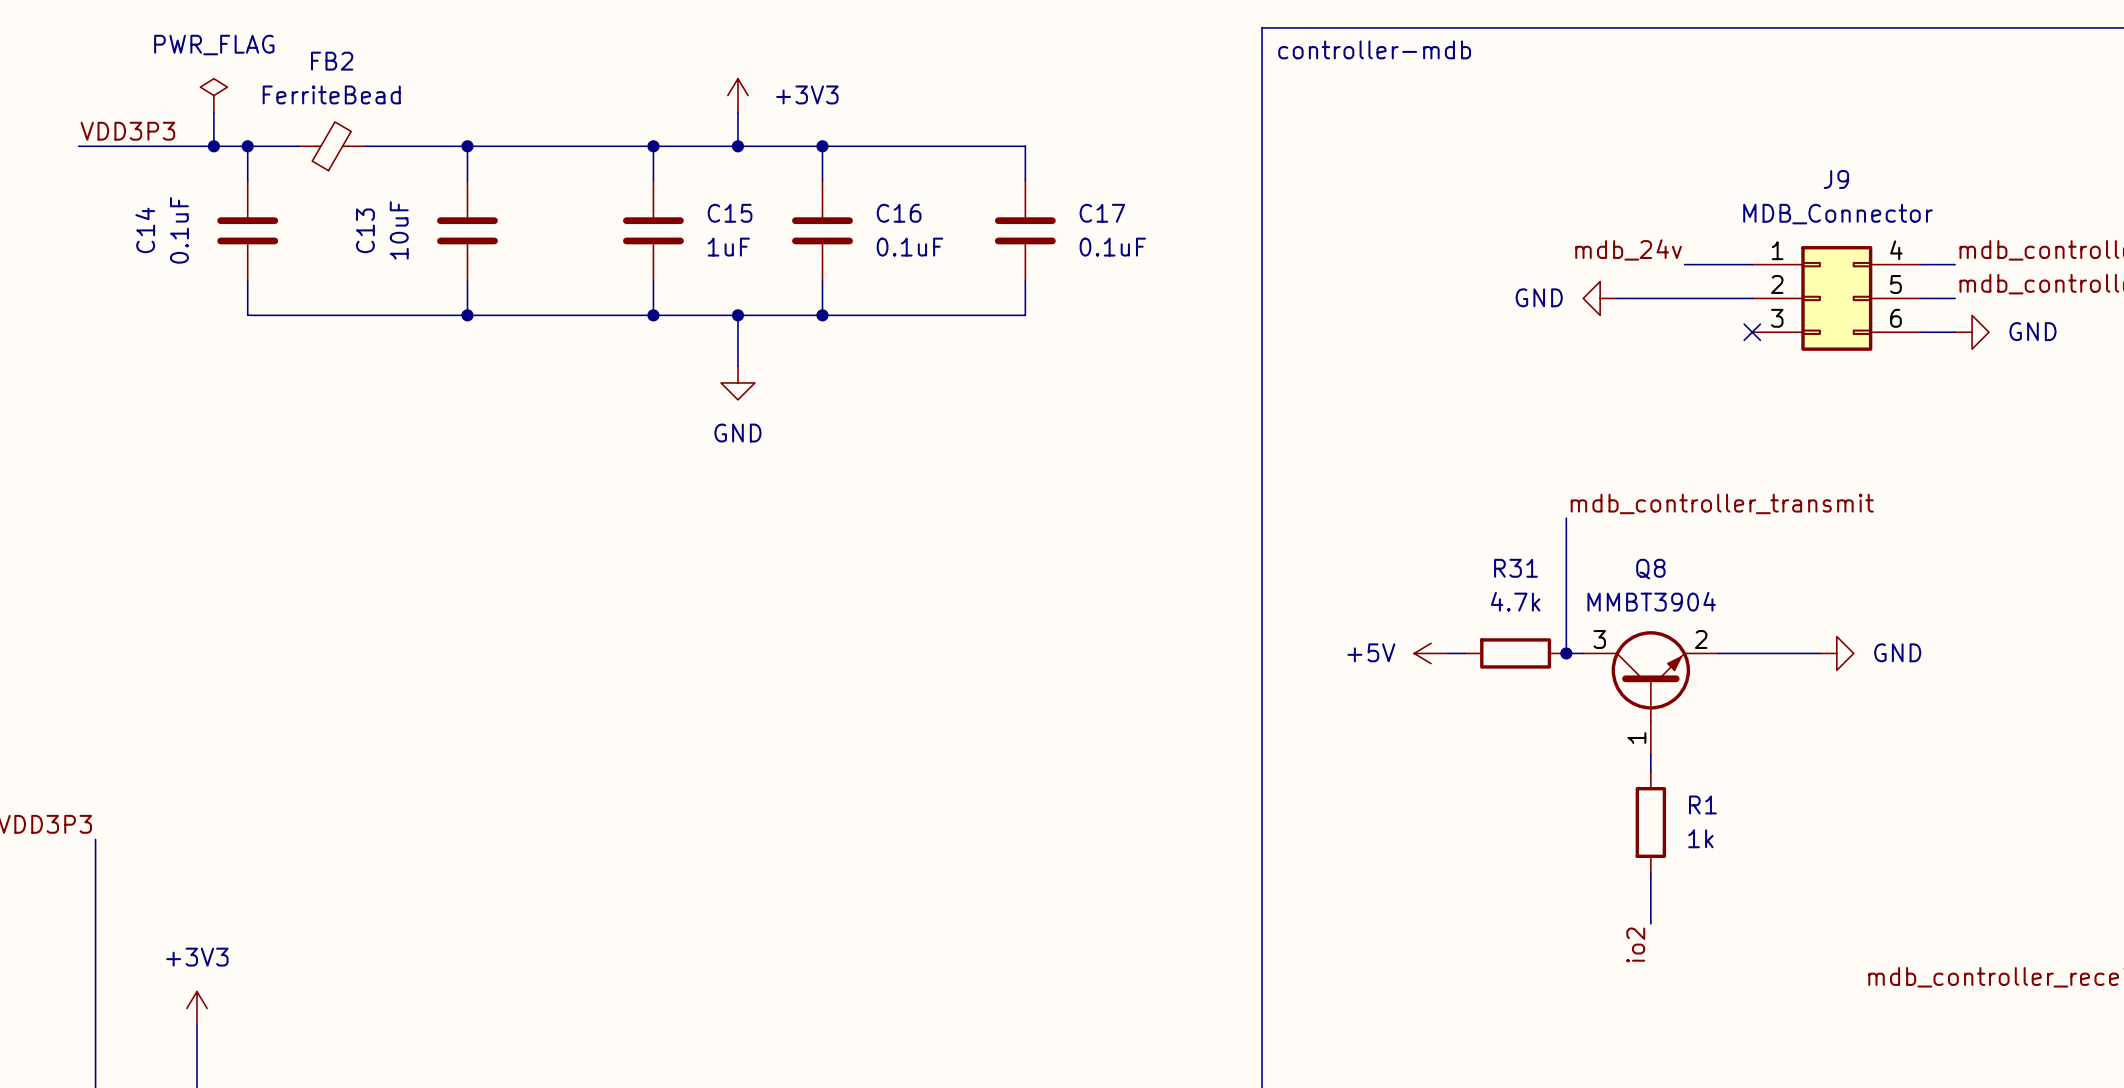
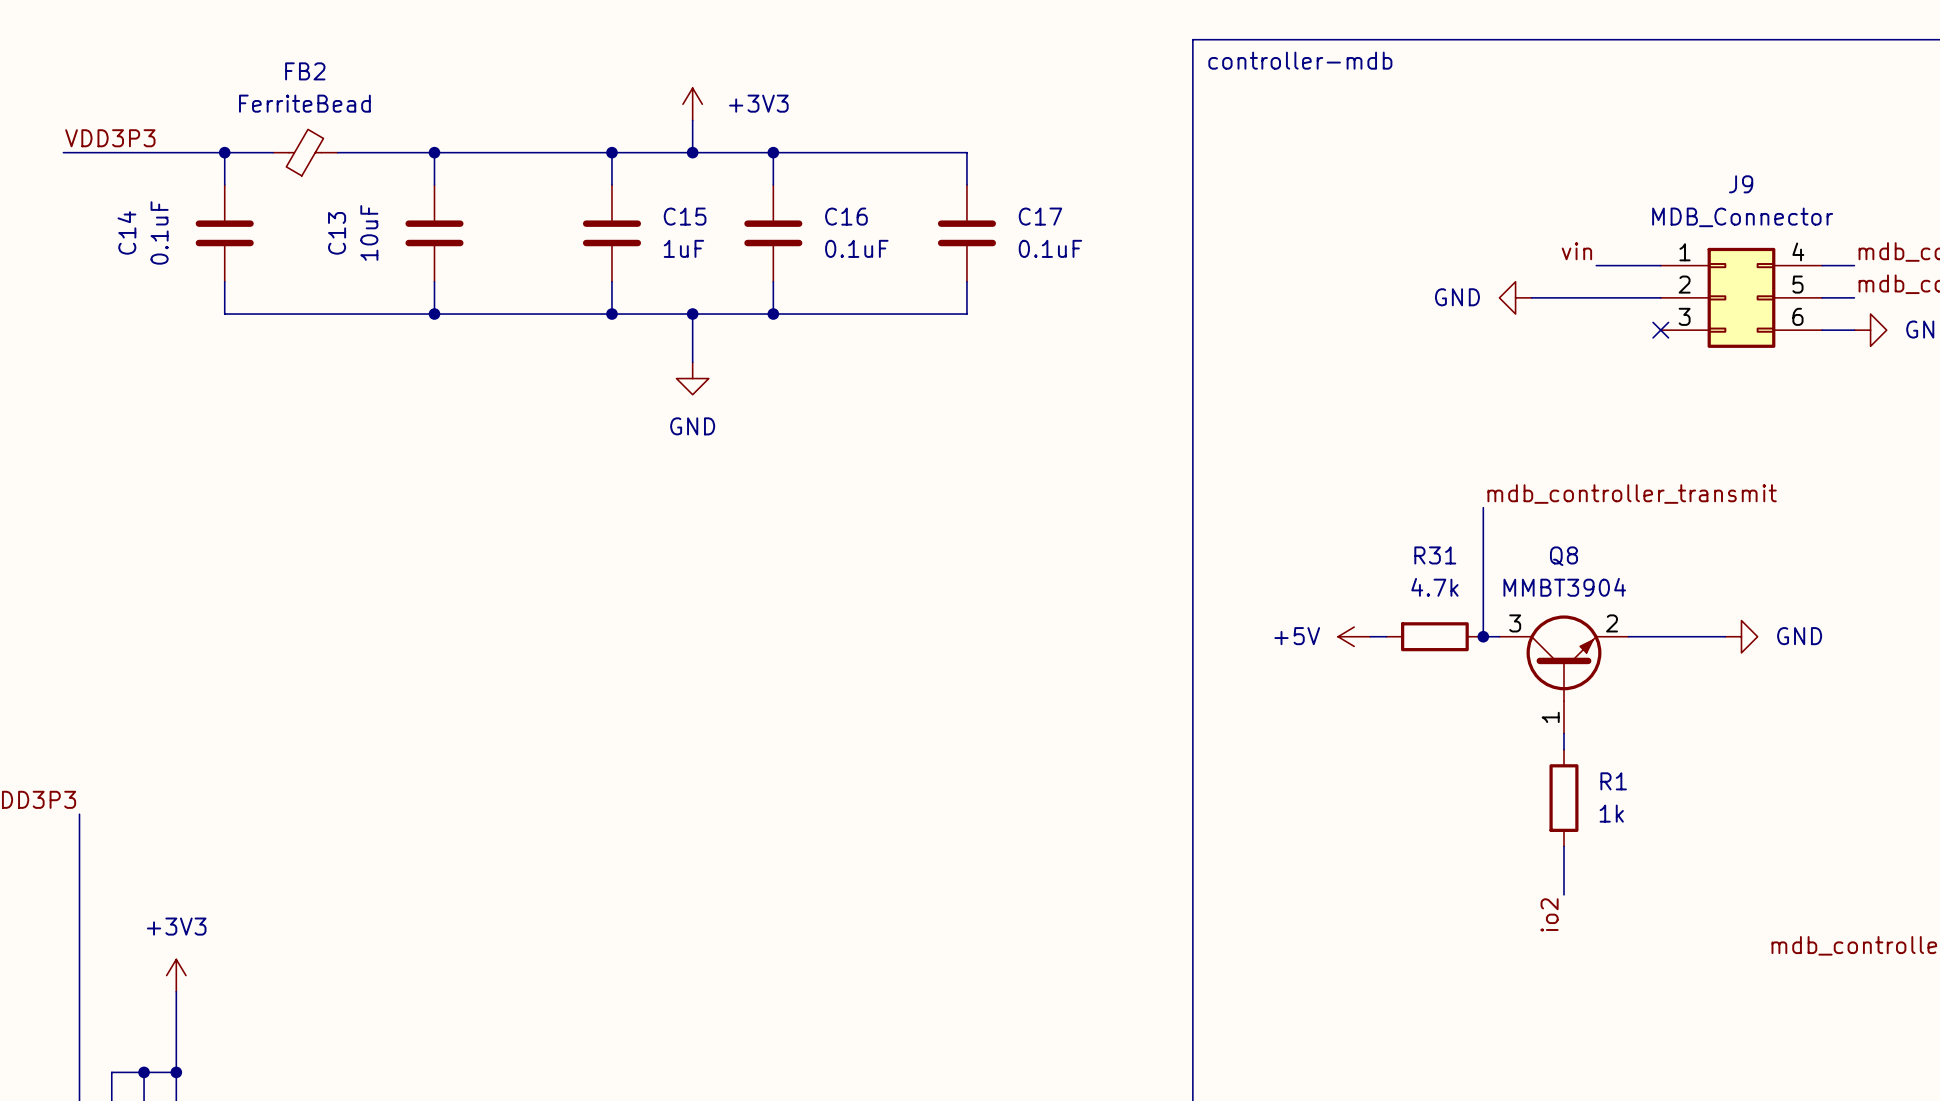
power symbol: PWR_FLAG (213, 95) -> none
wire: (213, 112) (213, 146) -> none
junction: (213, 146) -> none
label: mdb_24v (1628, 249) -> vin (1576, 251)

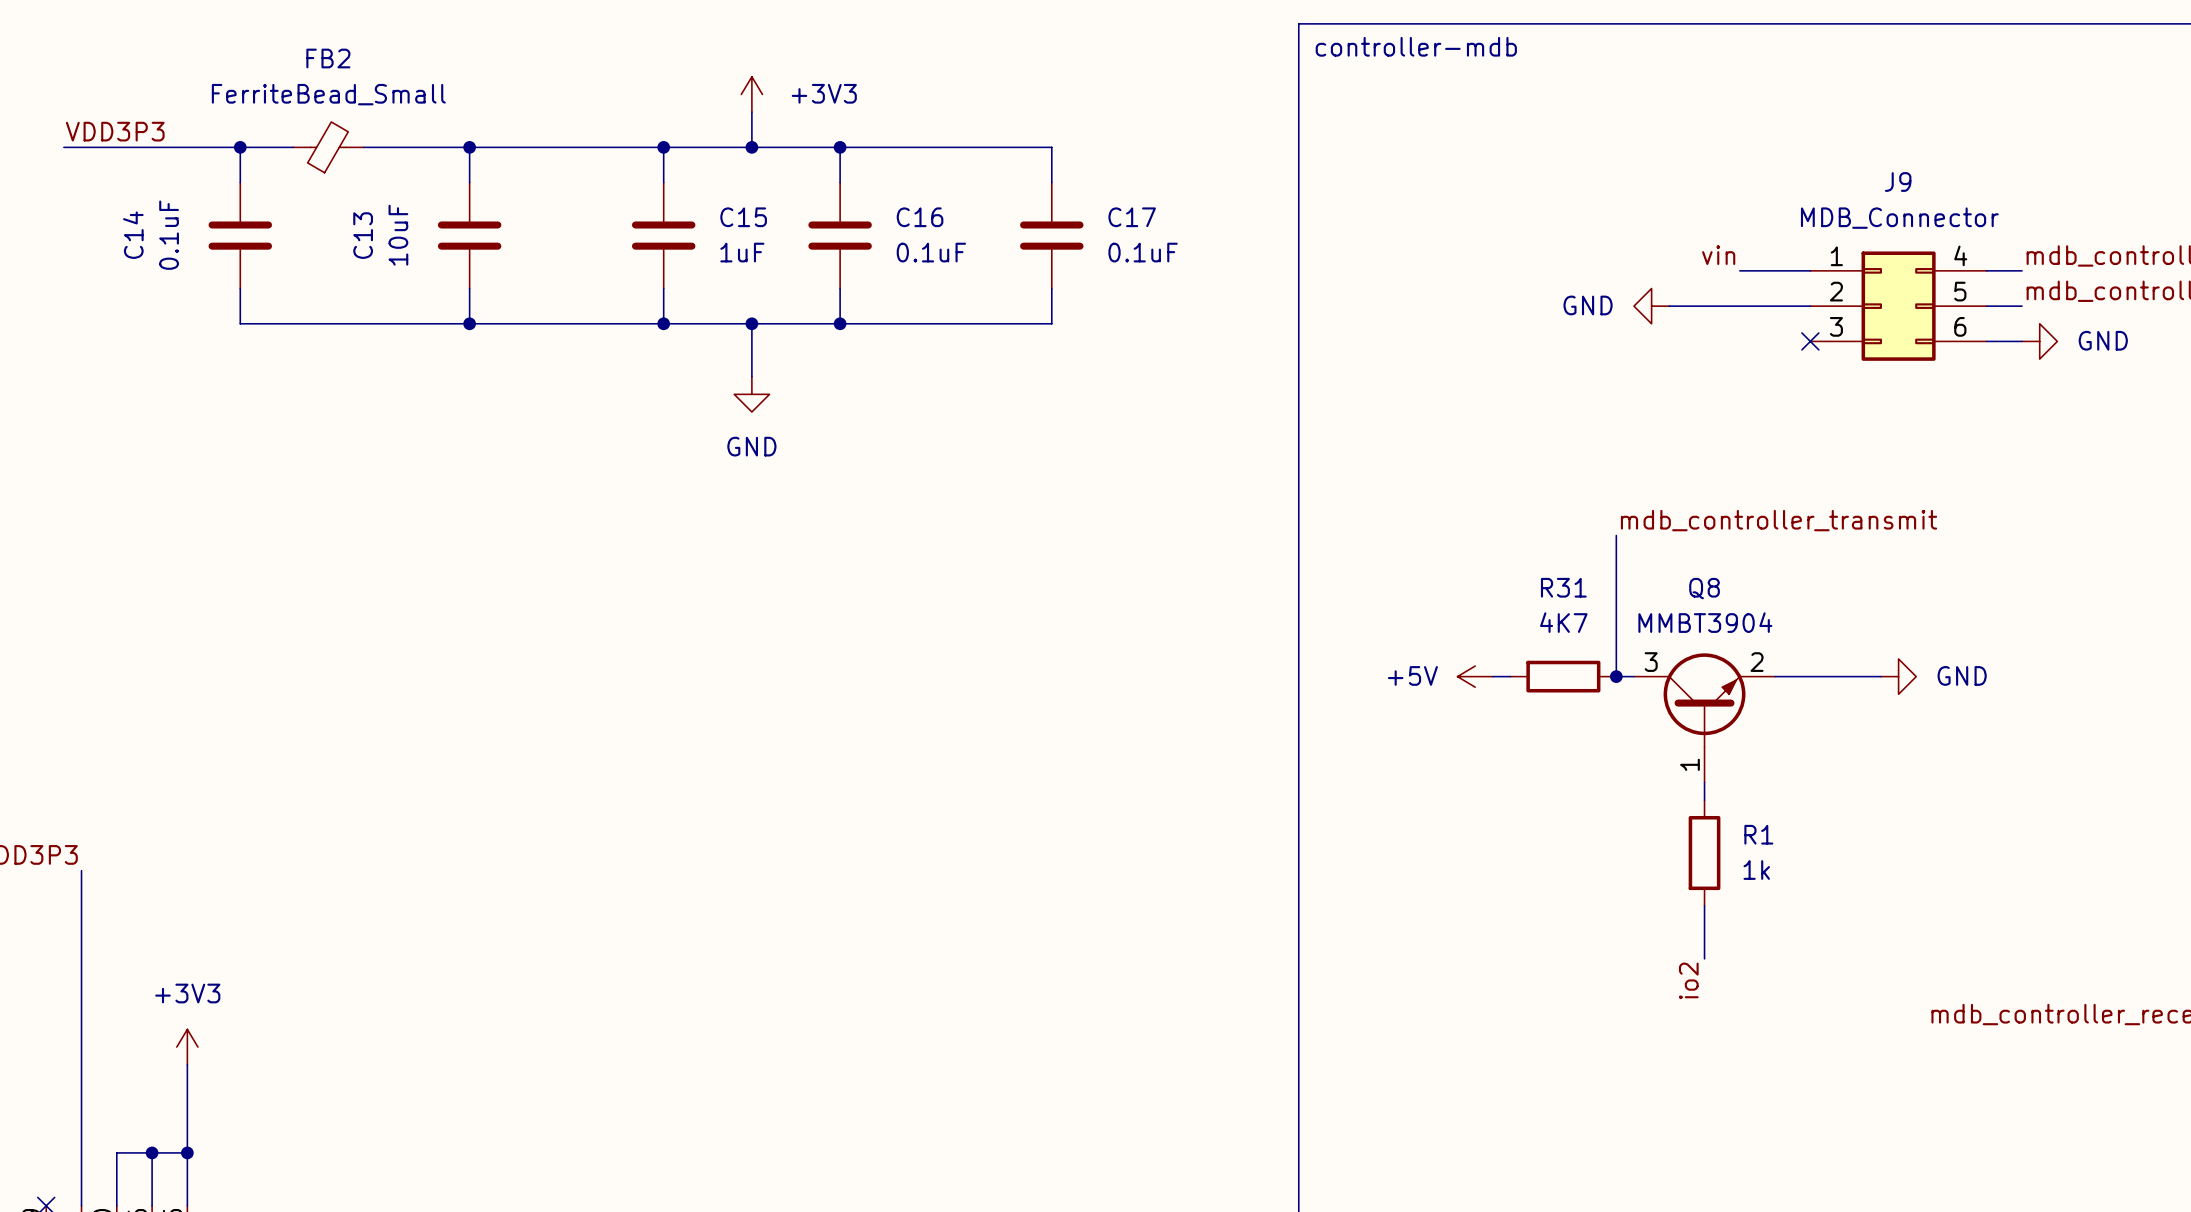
FB2 value: FerriteBead (304, 103) -> FerriteBead_Small (328, 94)
R31 value: 4.7k (1434, 587) -> 4K7 (1563, 622)

